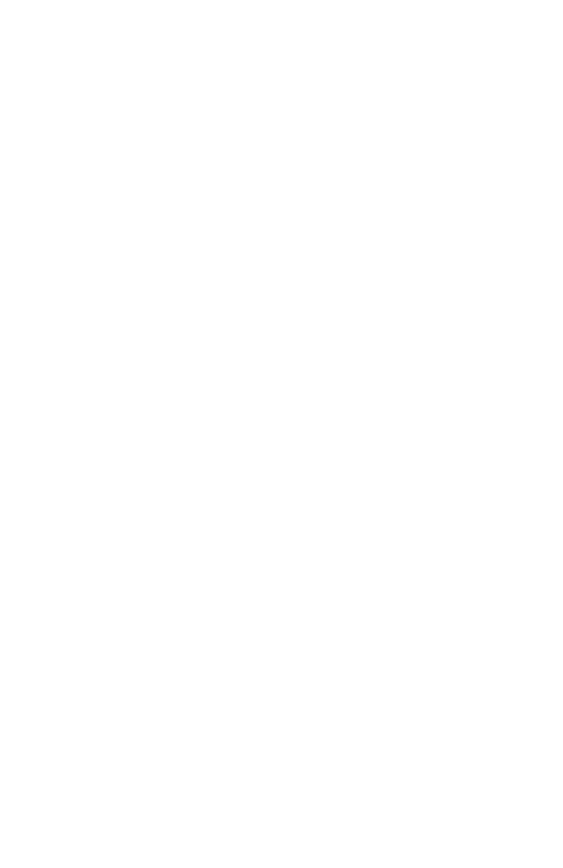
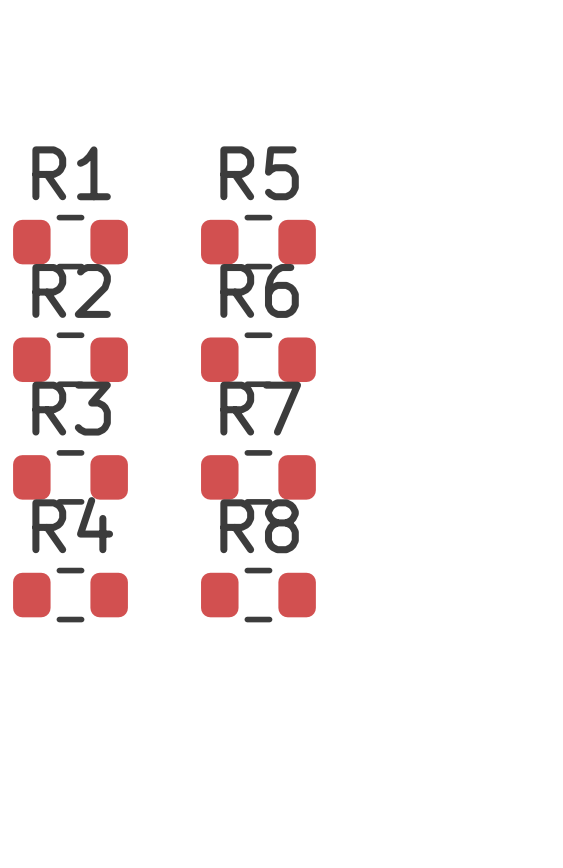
R1: none -> (70, 242)
R5: none -> (258, 242)
R2: none -> (70, 359)
R6: none -> (258, 359)
R3: none -> (70, 477)
R7: none -> (258, 477)
R4: none -> (70, 595)
R8: none -> (258, 595)

